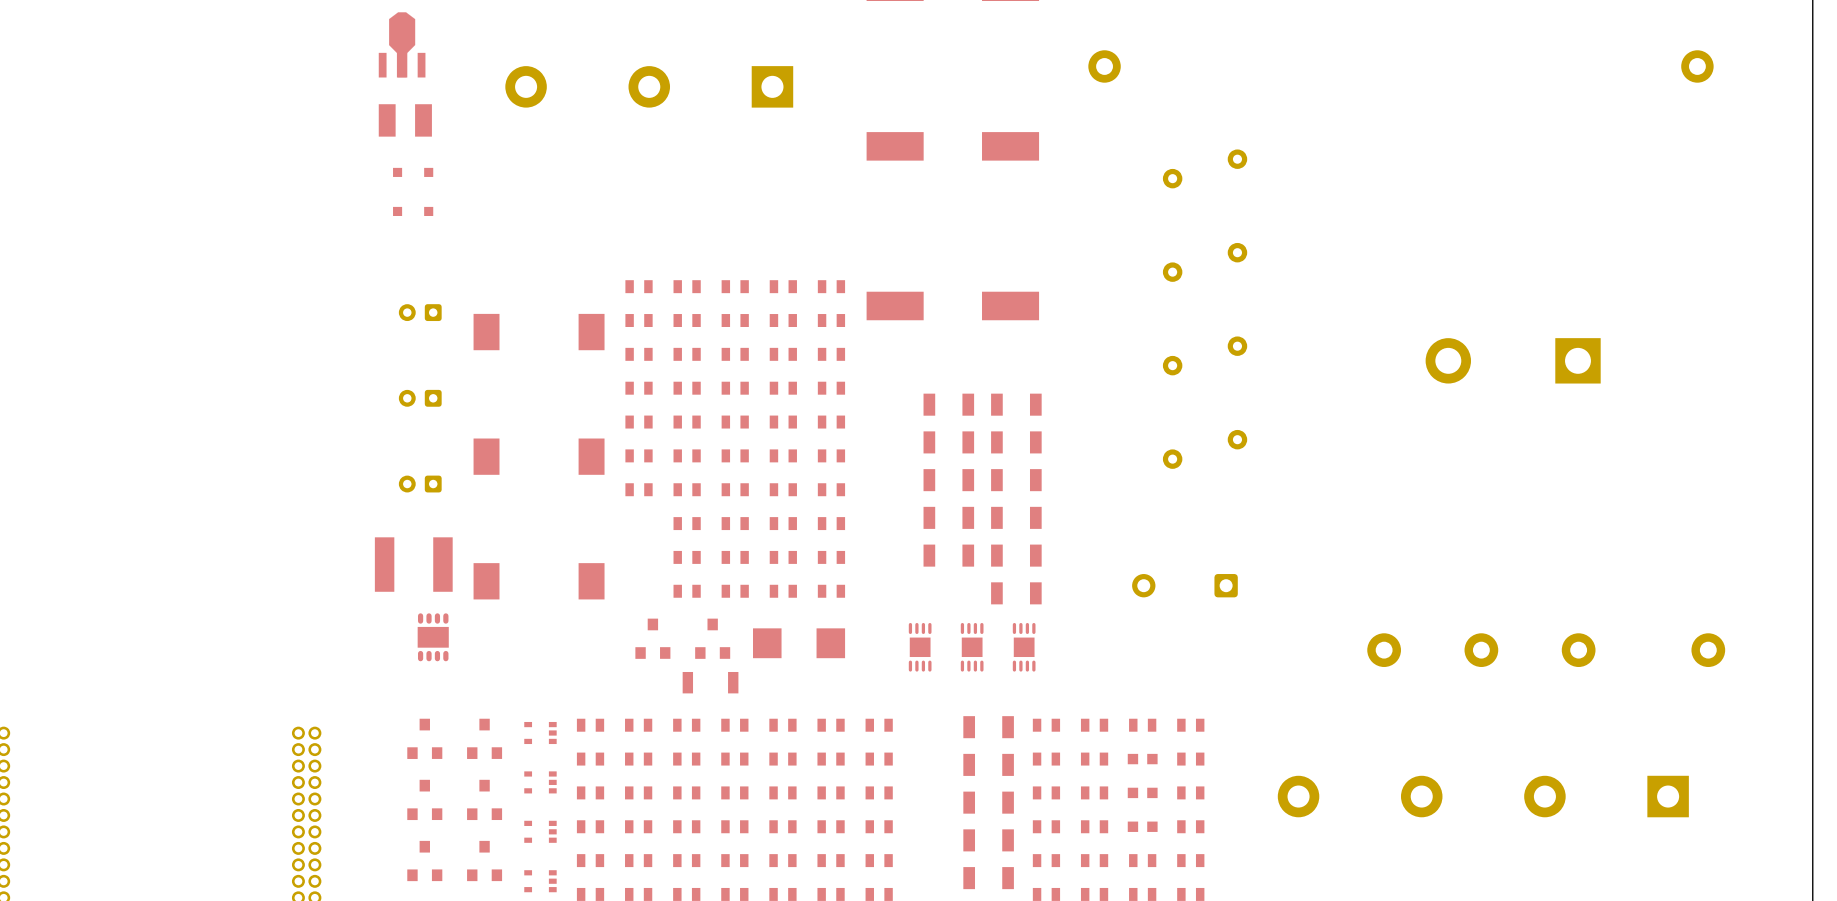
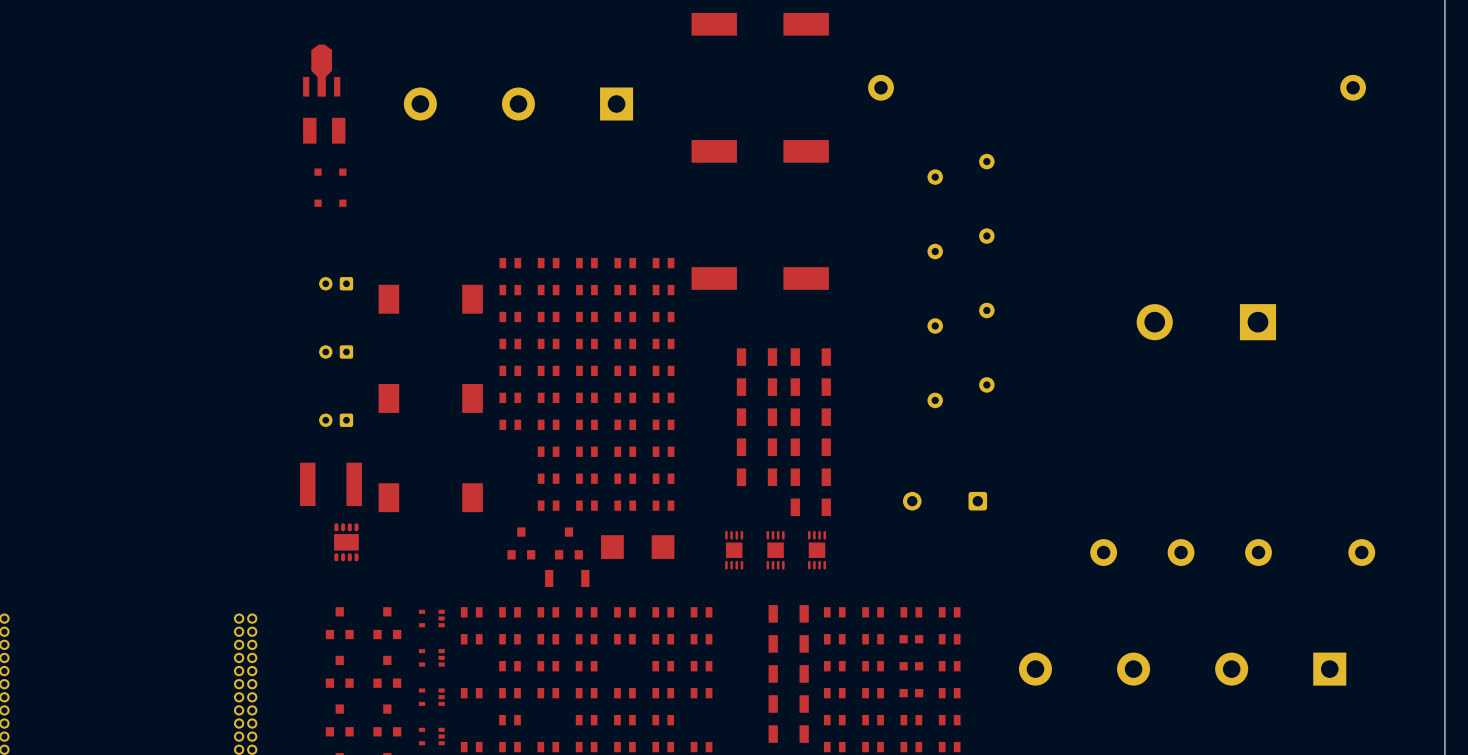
part: (590, 792) -> none
part: (782, 792) -> none
part: (590, 860) -> none
part: (686, 860) -> none
part: (879, 860) -> none

